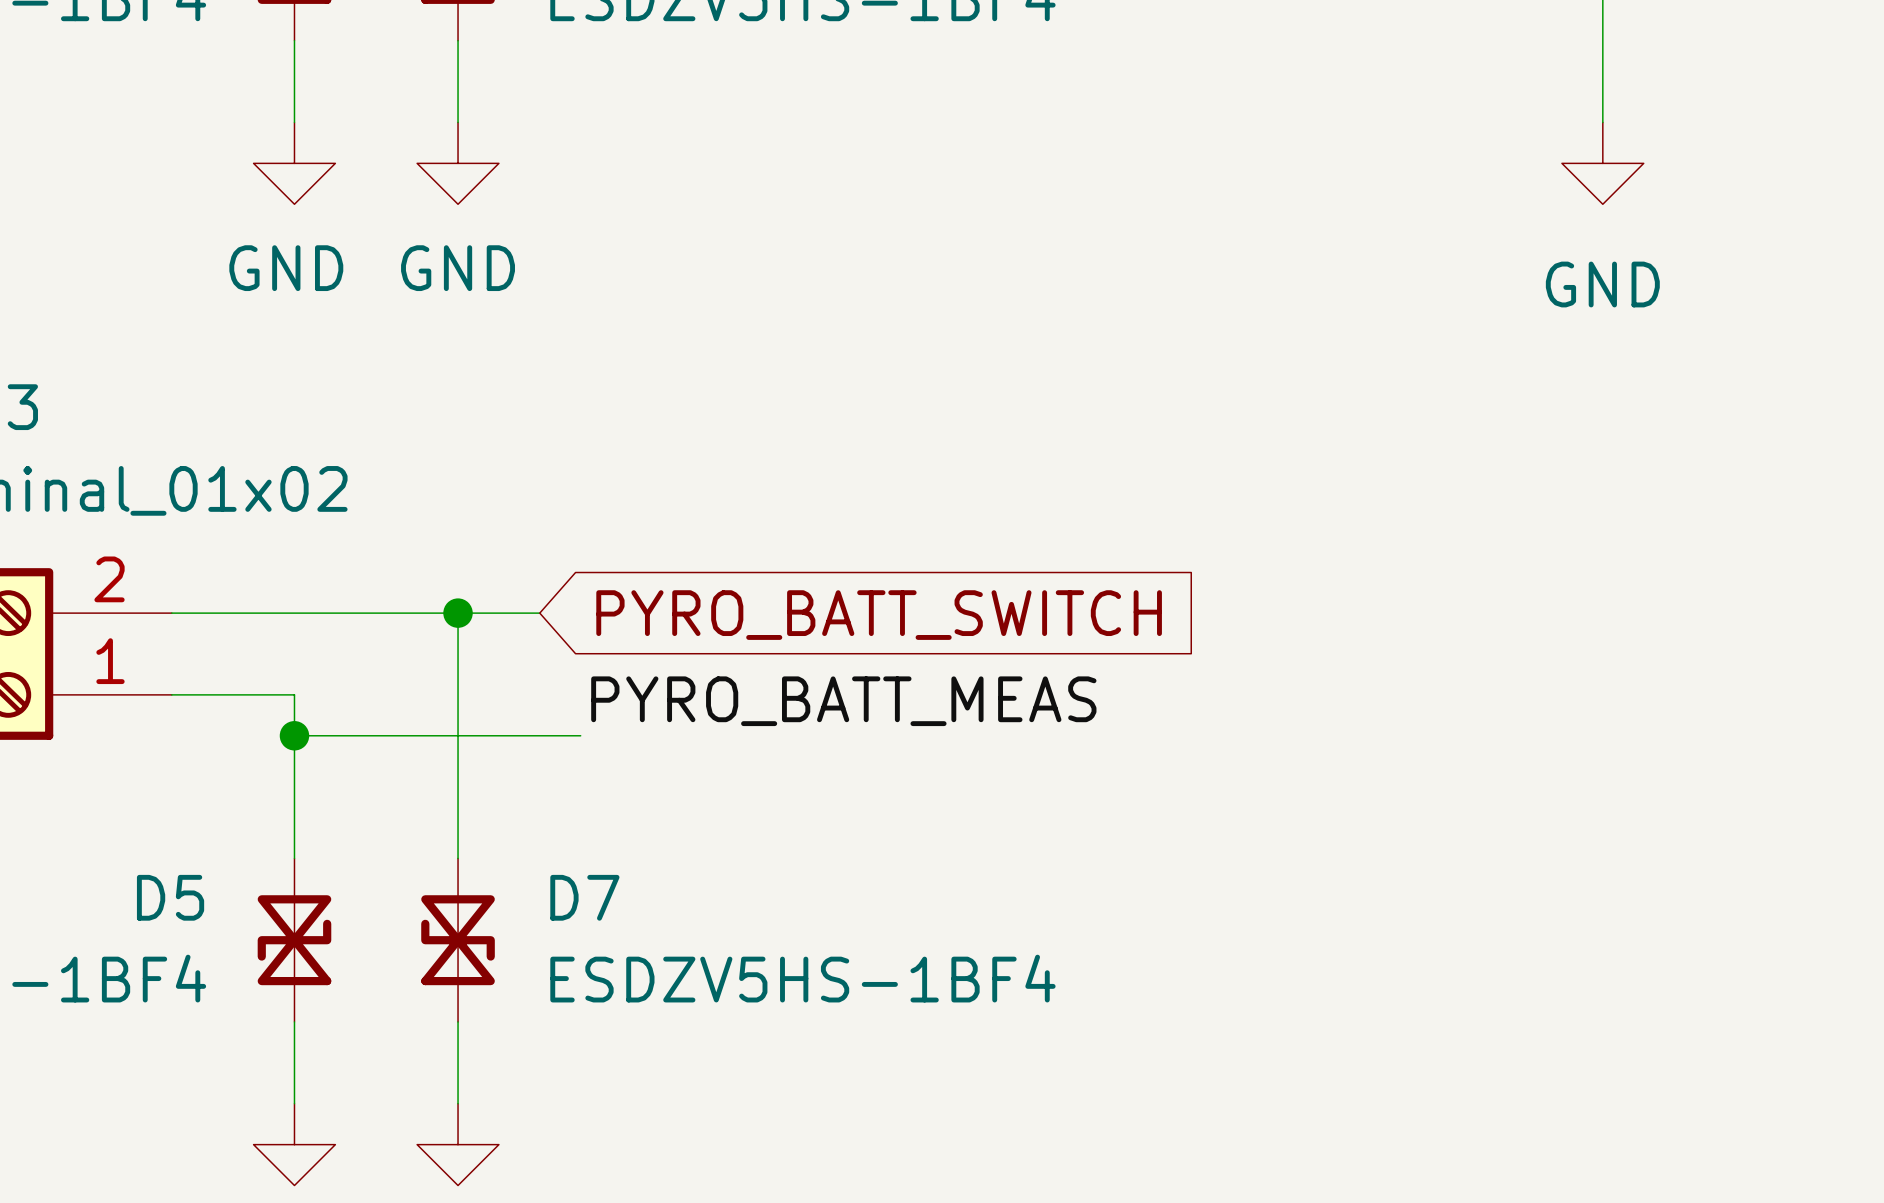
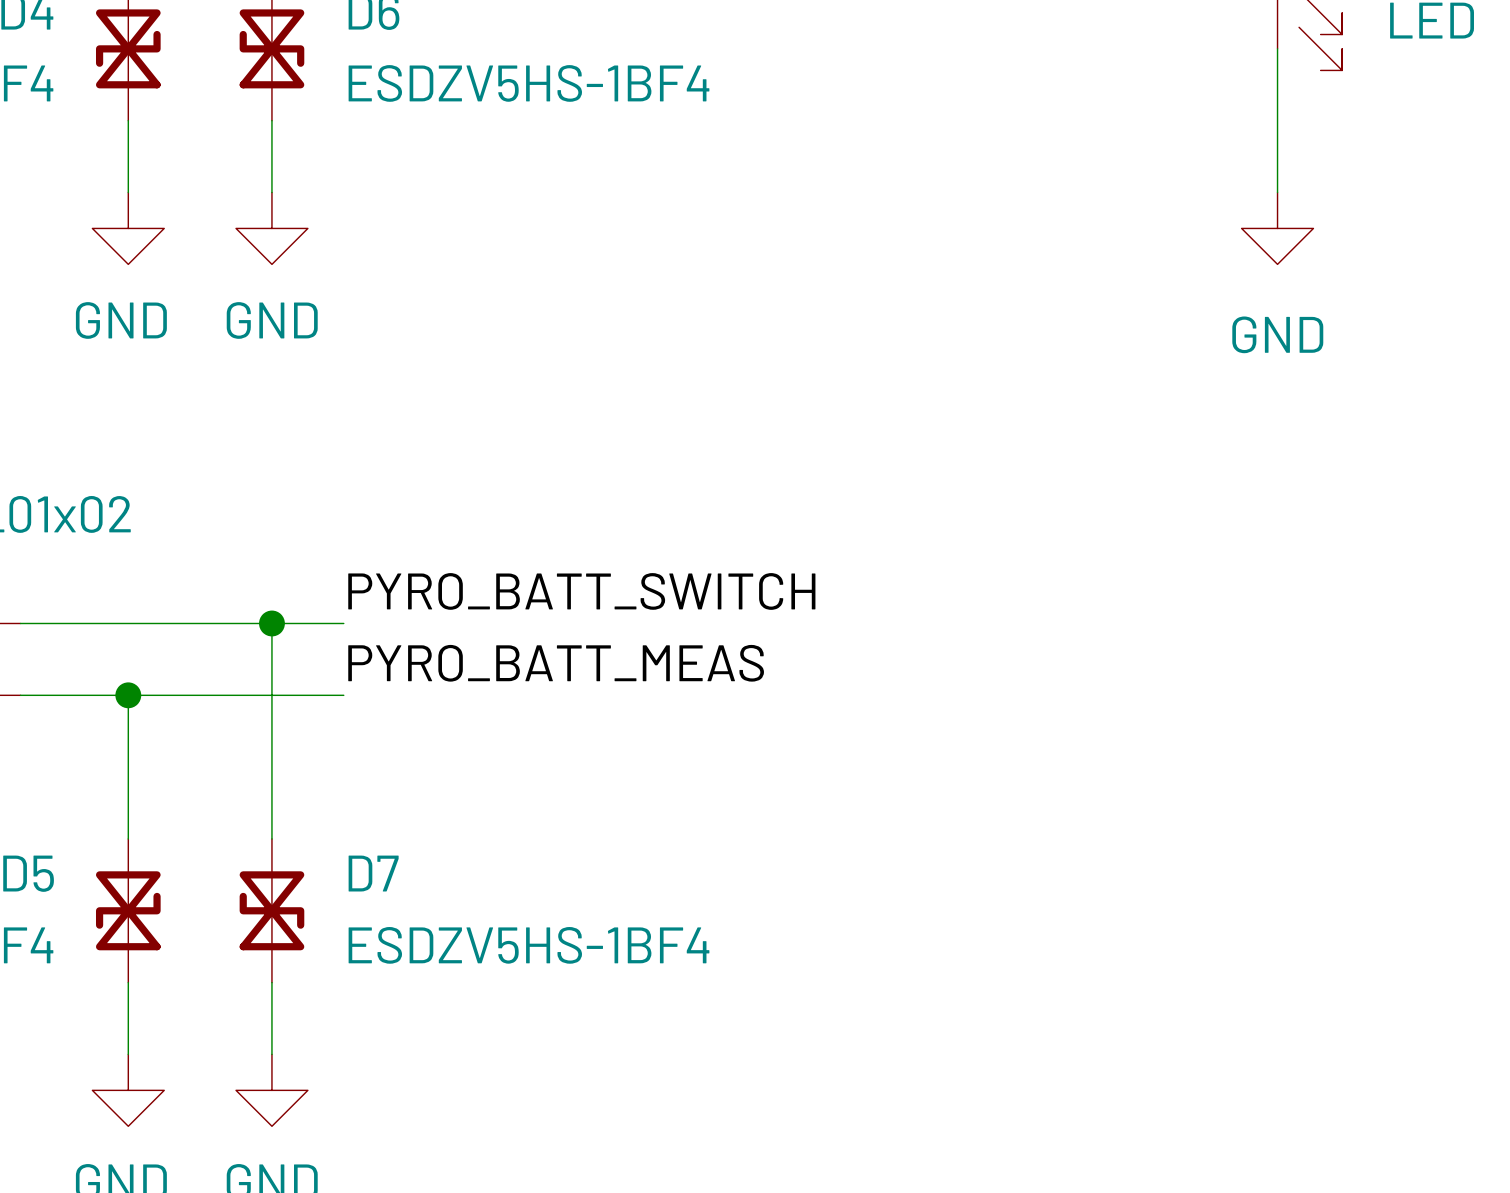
label: none -> PYRO_BATT_SWITCH (581, 591)
global label: PYRO_BATT_SWITCH (879, 615) -> none
wire: none -> (128, 695) (343, 695)
label position: PYRO_BATT_MEAS (843, 701) -> PYRO_BATT_MEAS (556, 663)
wire: (294, 735) (580, 735) -> none
junction position: (294, 735) -> (128, 695)

